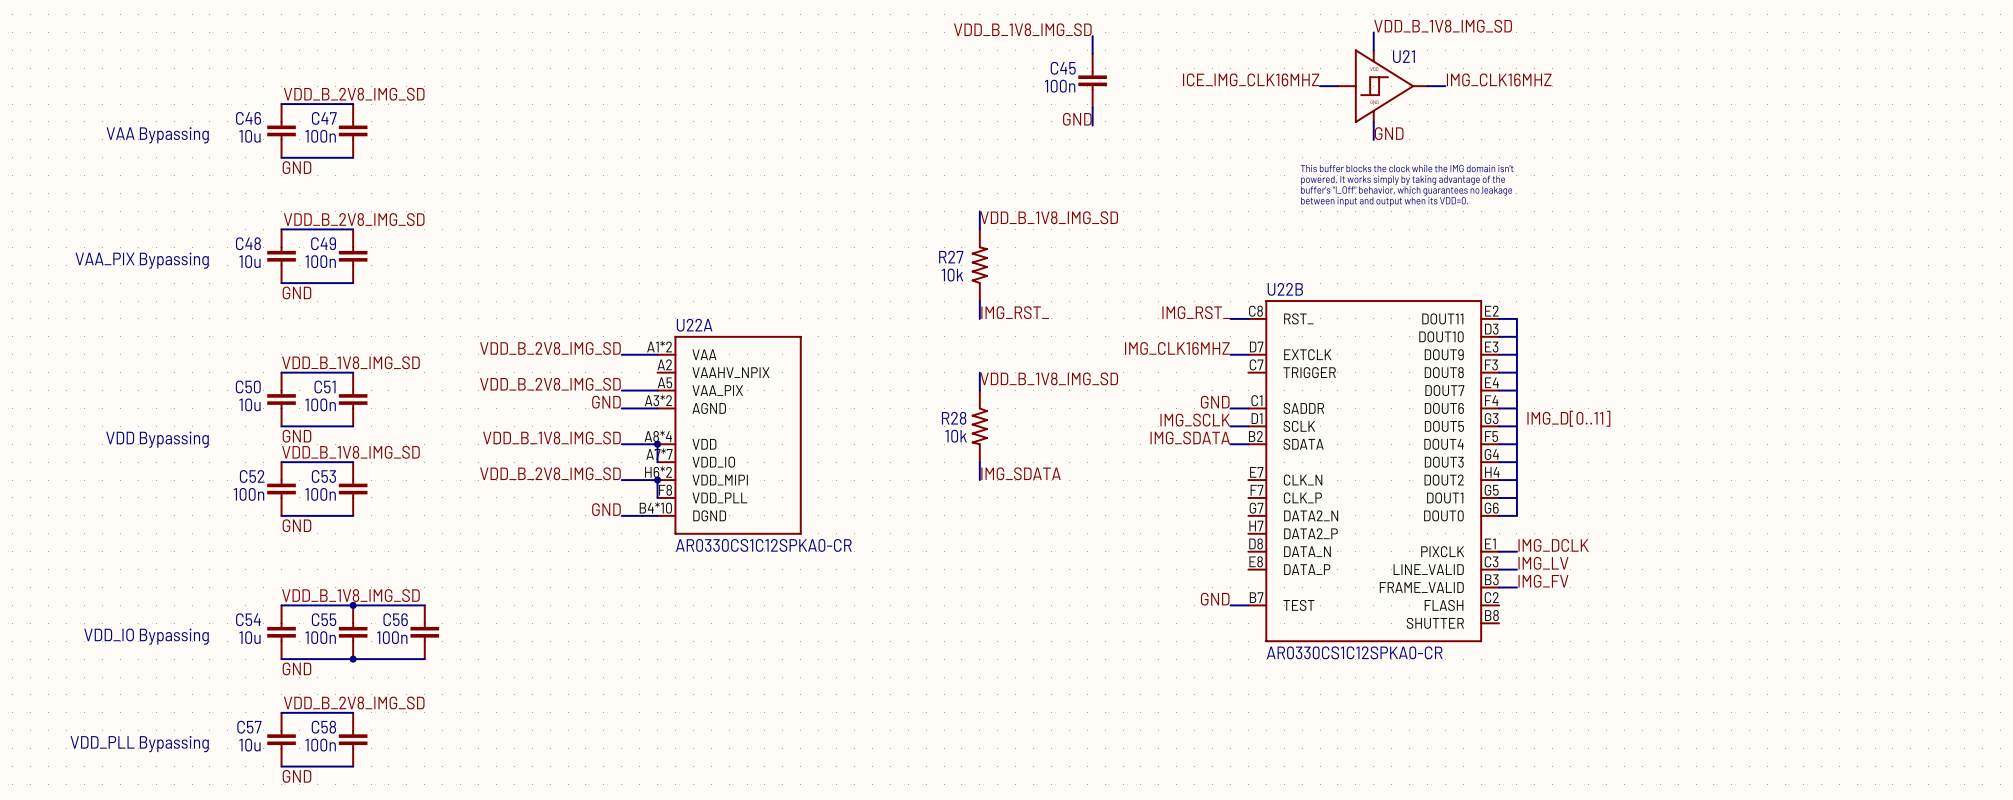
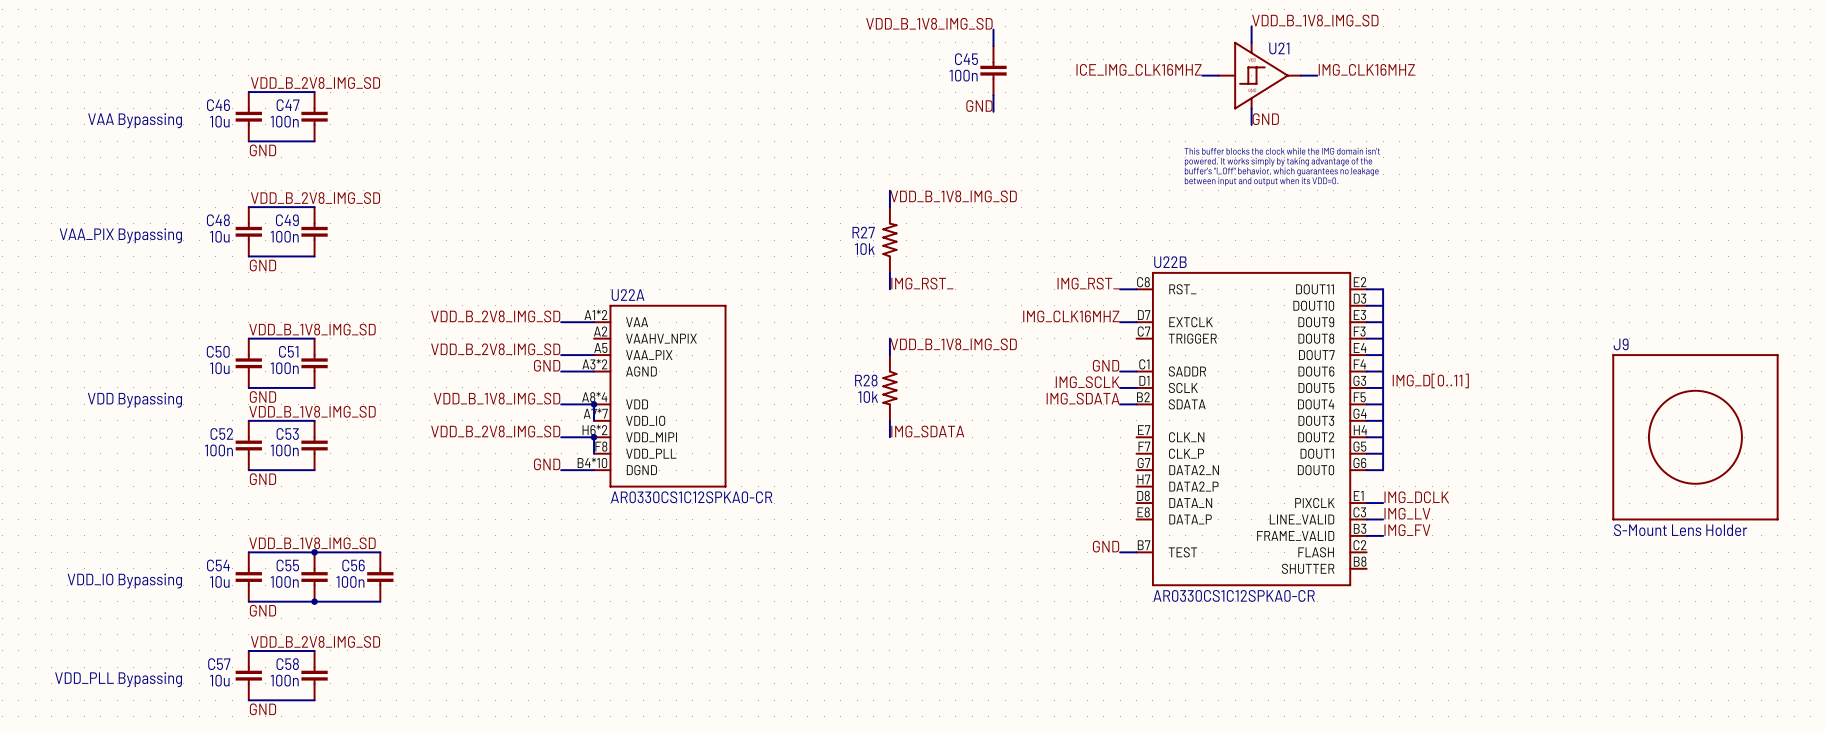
J9: none -> (1695, 437)

